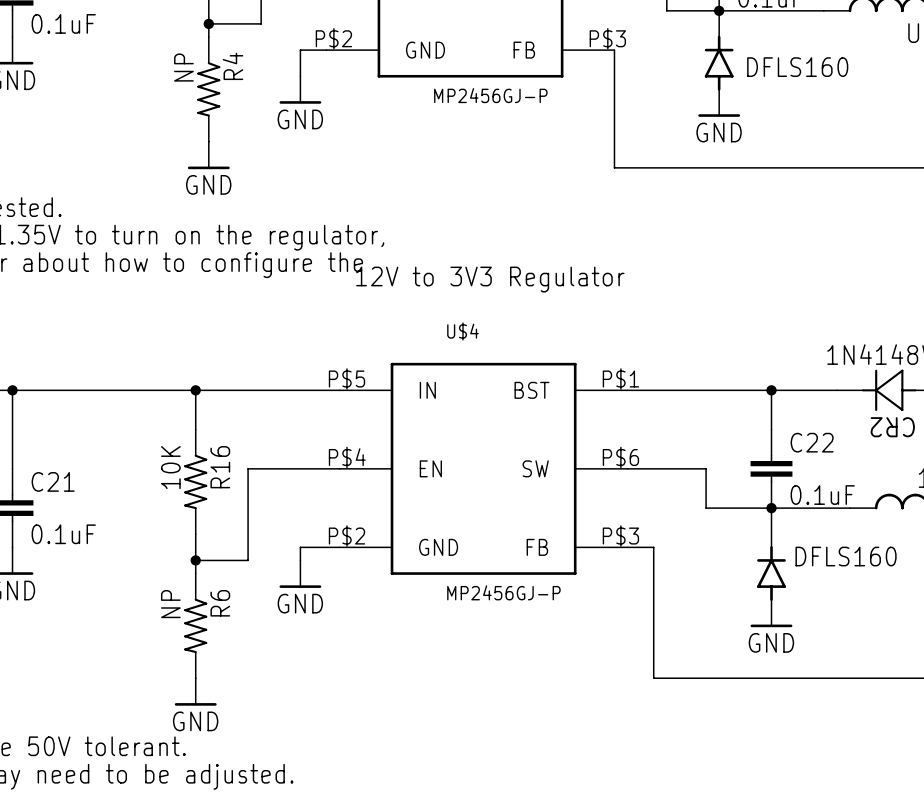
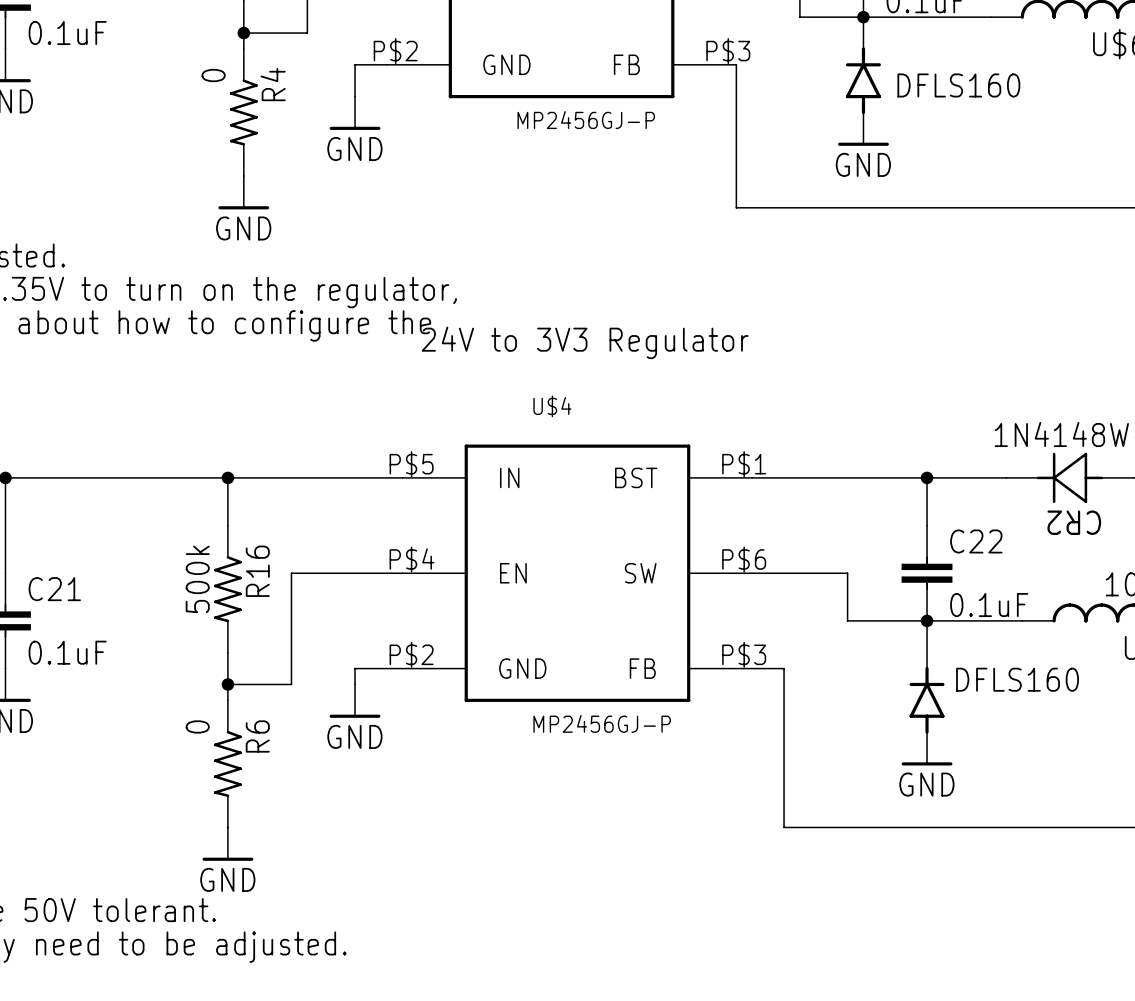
R4 value: NP (183, 67) -> 0 (213, 75)
text: 12V to 3V3 Regulator (490, 279) -> 24V to 3V3 Regulator (585, 342)
R16 value: 10K (170, 467) -> 500k (197, 579)
R6 value: NP (170, 604) -> 0 (197, 726)

